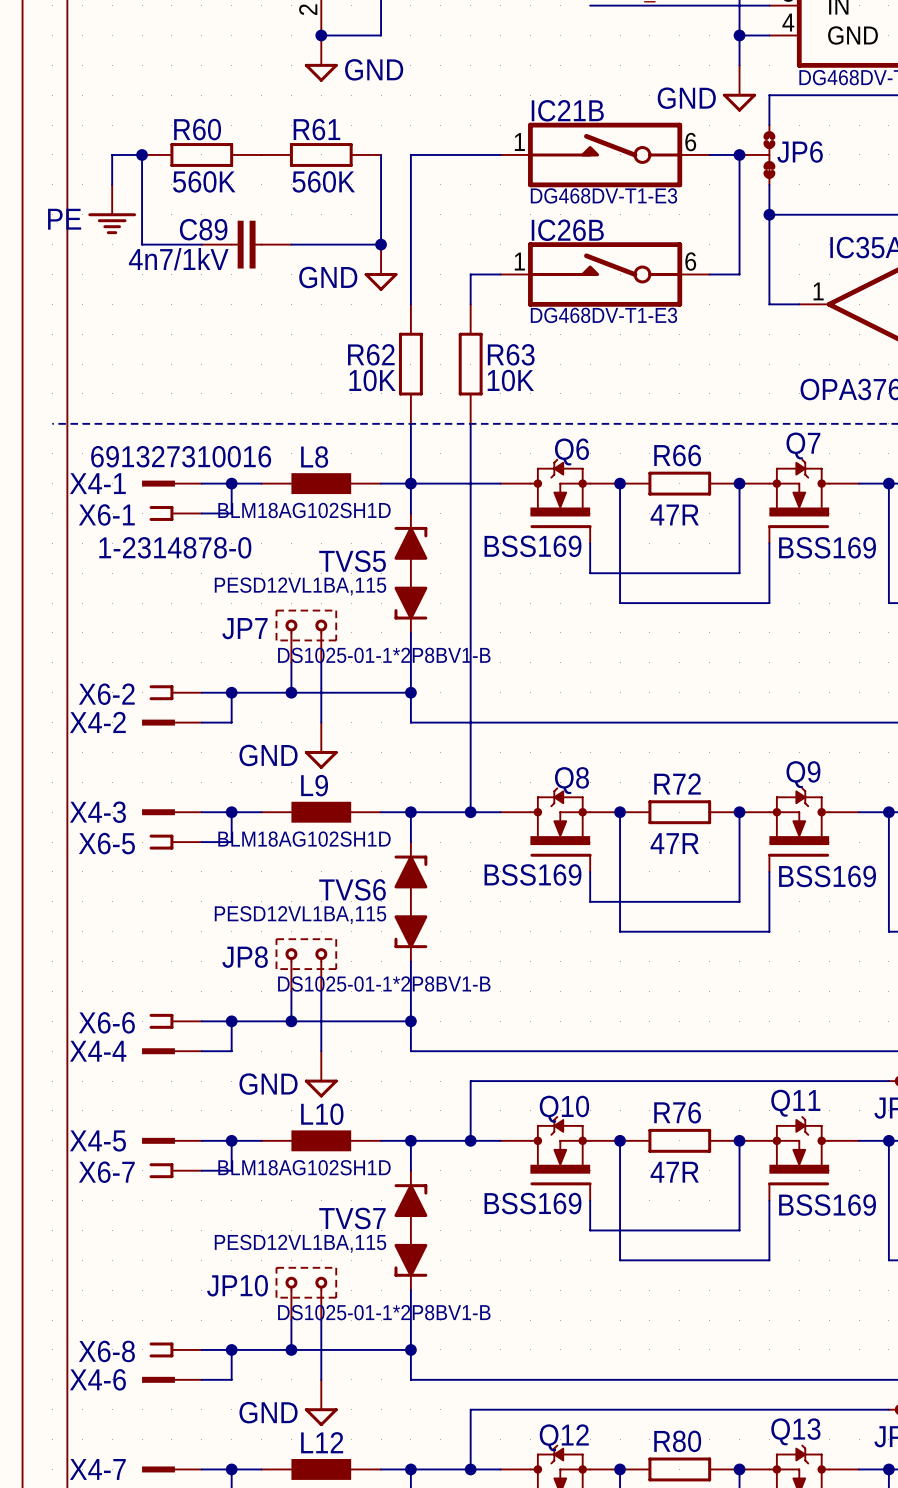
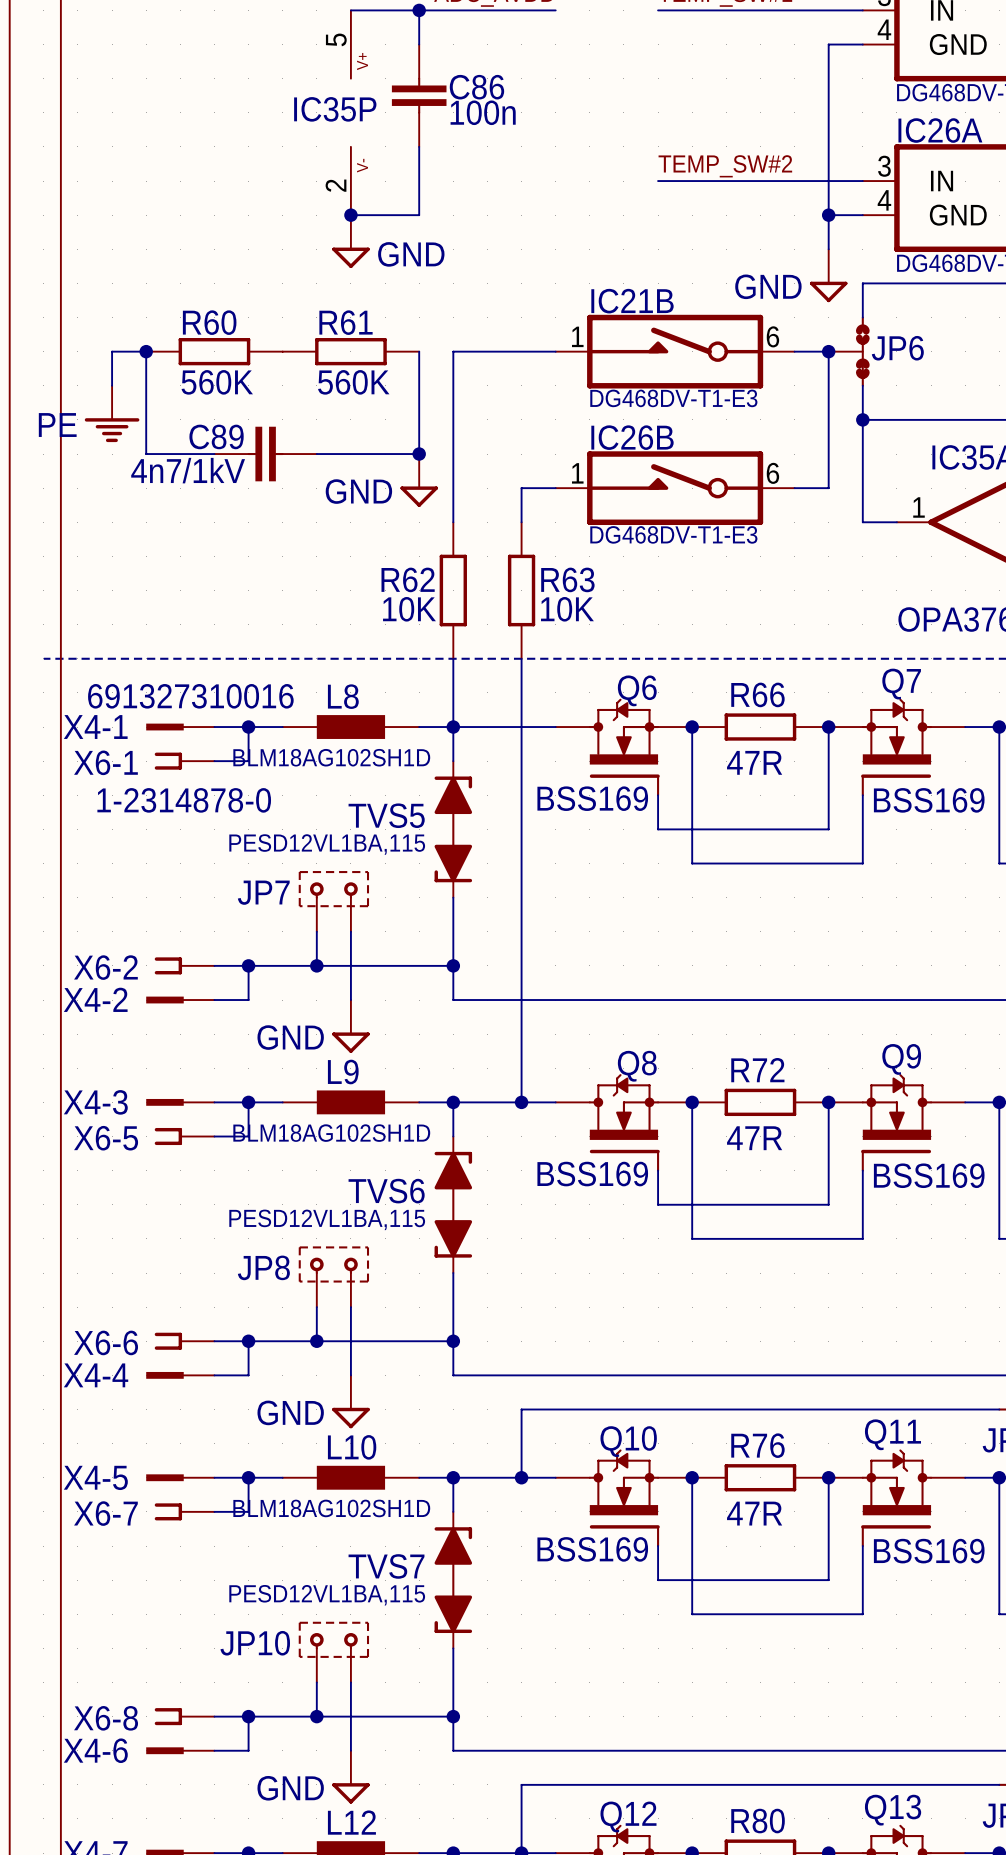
JP7 value: DS1025-01-1*2P8BV1-B (384, 655) -> none
JP8 value: DS1025-01-1*2P8BV1-B (384, 983) -> none
JP10 value: DS1025-01-1*2P8BV1-B (384, 1312) -> none

